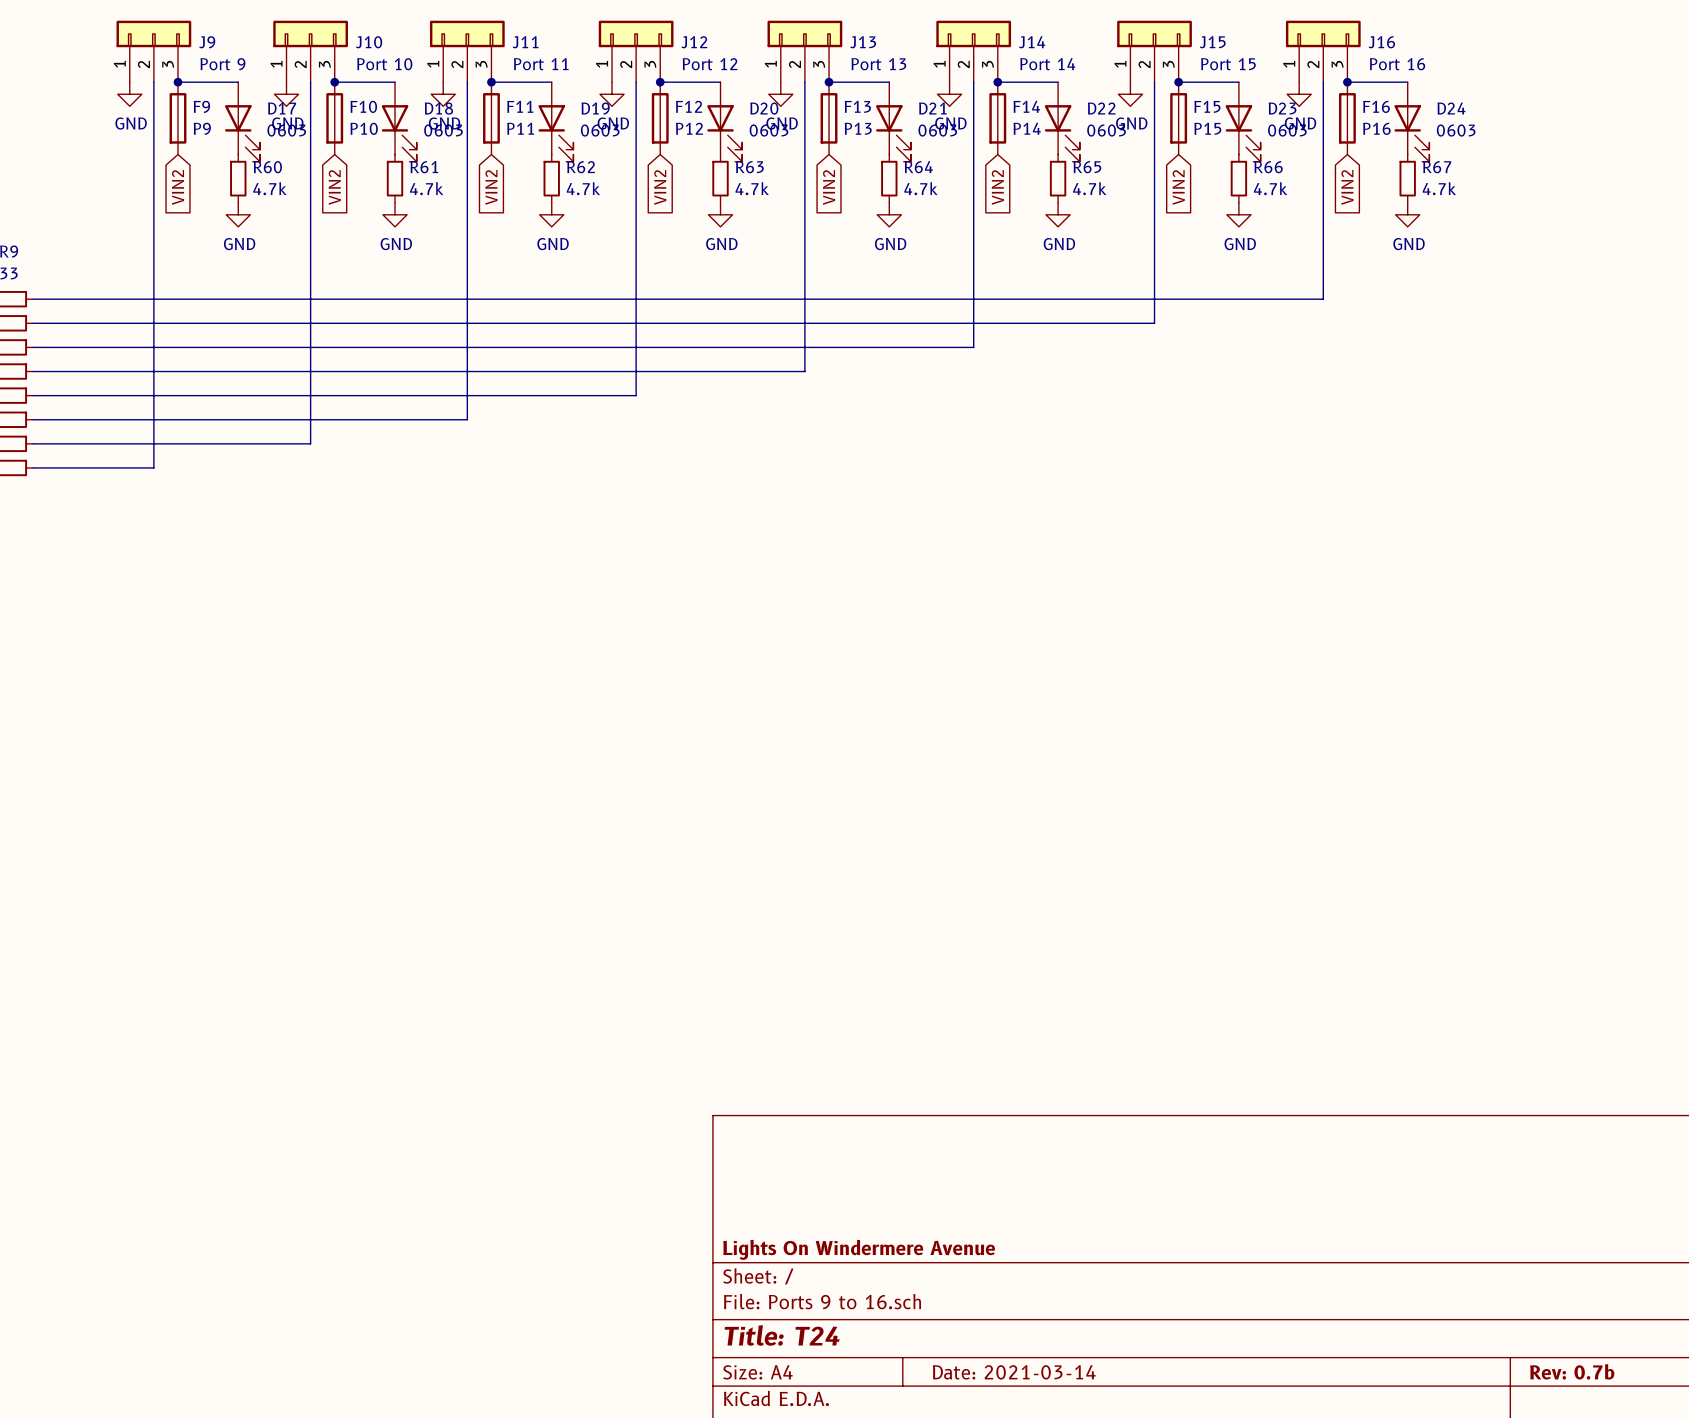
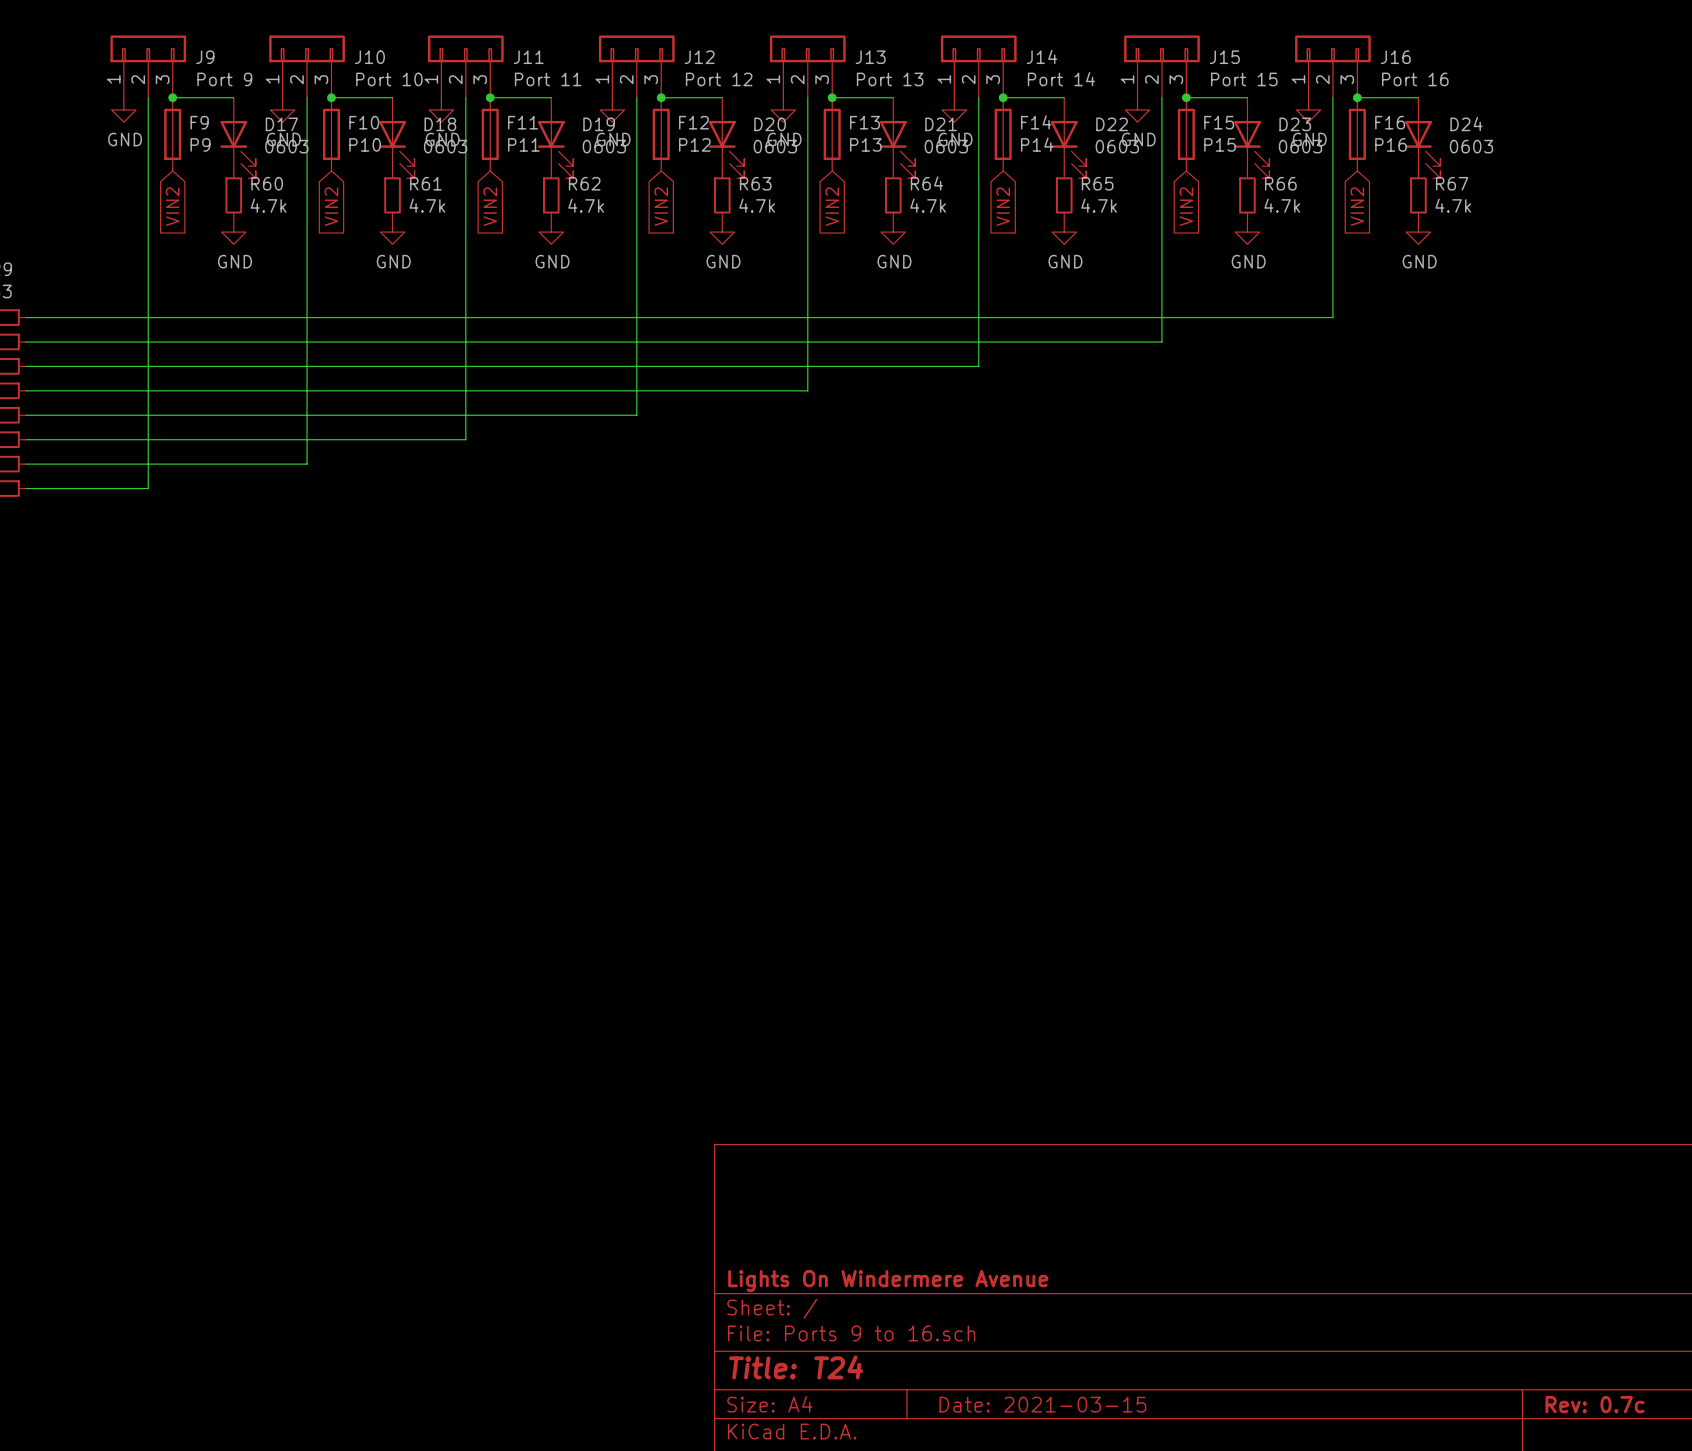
title block: Rev: 0.7b (1572, 1371) -> Rev: 0.7c (1595, 1404)
title block: Date: 2021-03-14 (1014, 1372) -> Date: 2021-03-15 (1042, 1404)

